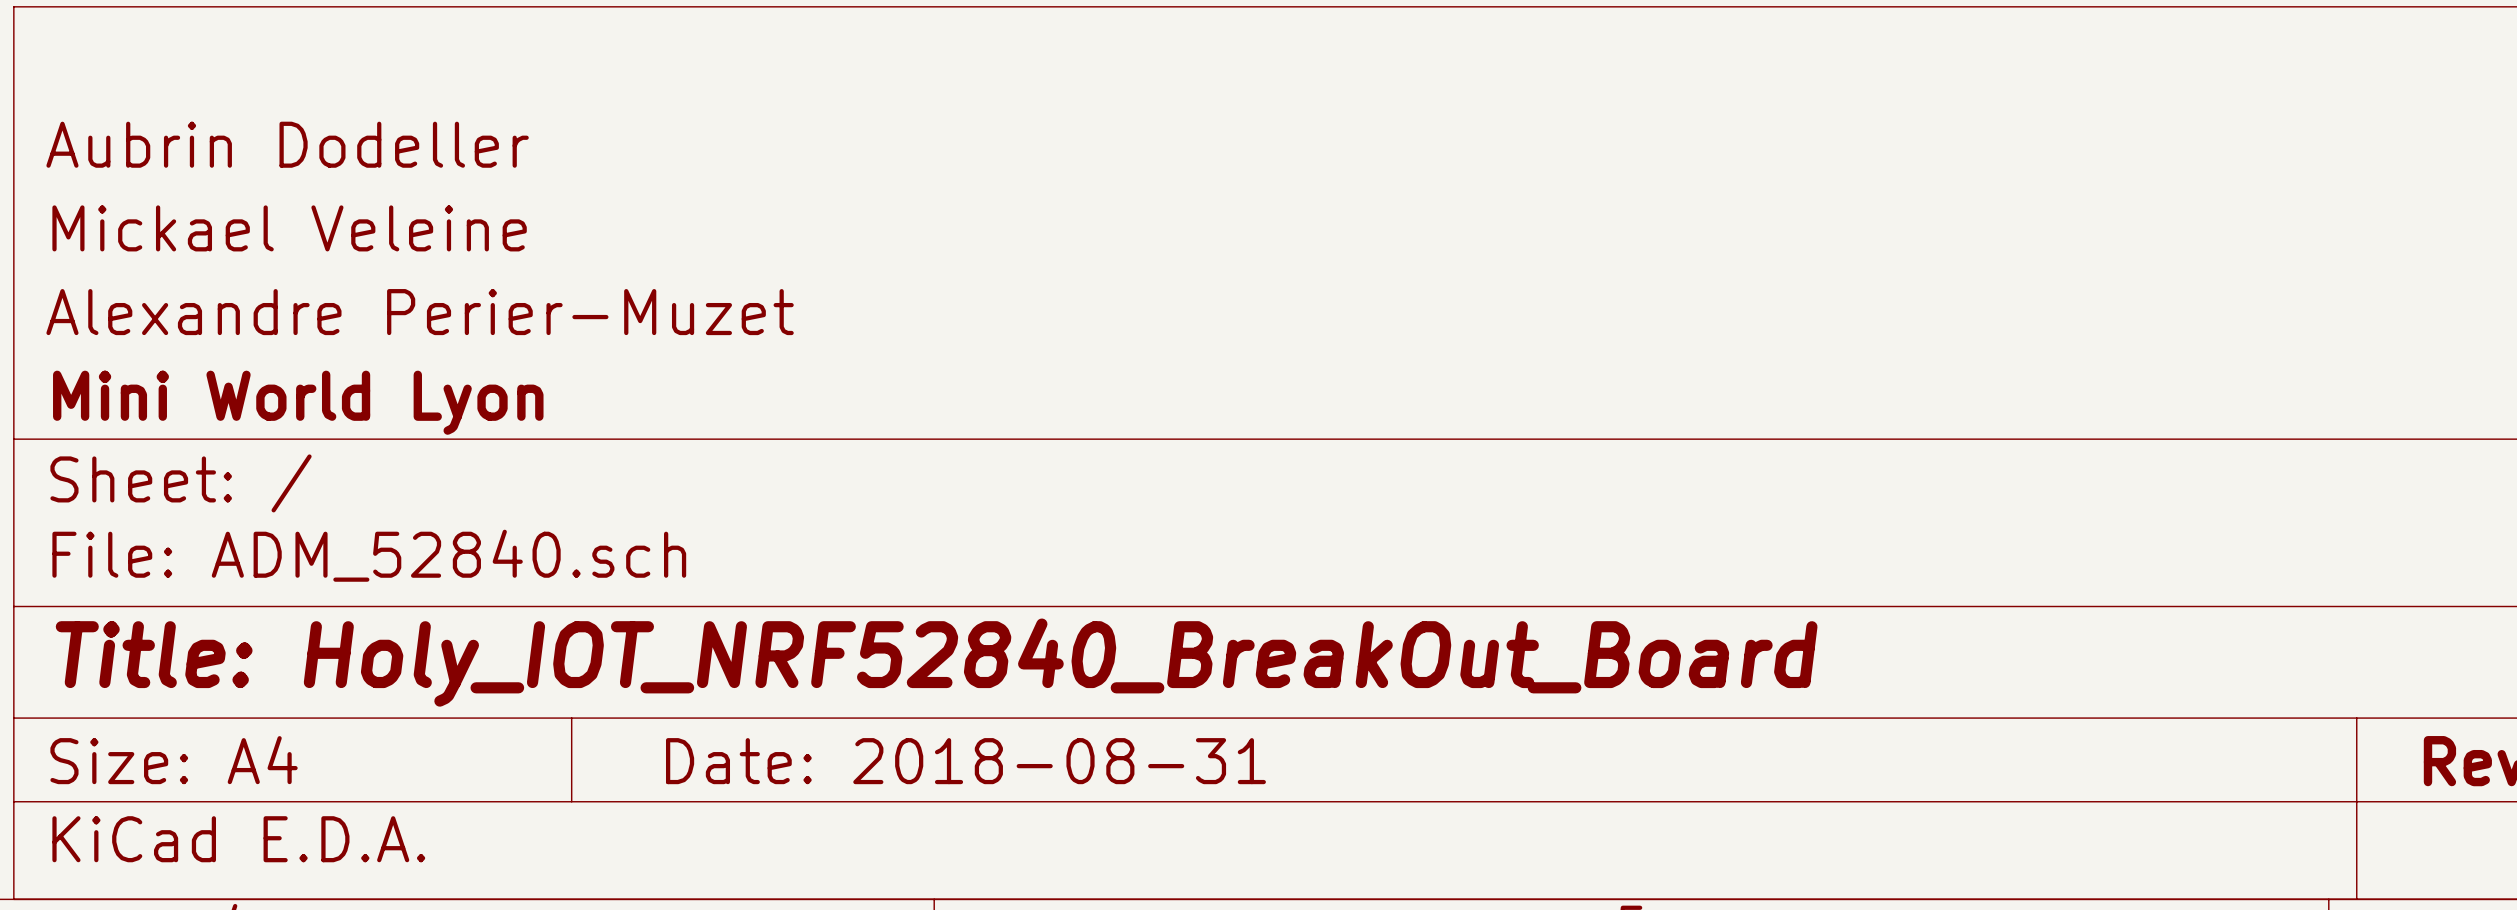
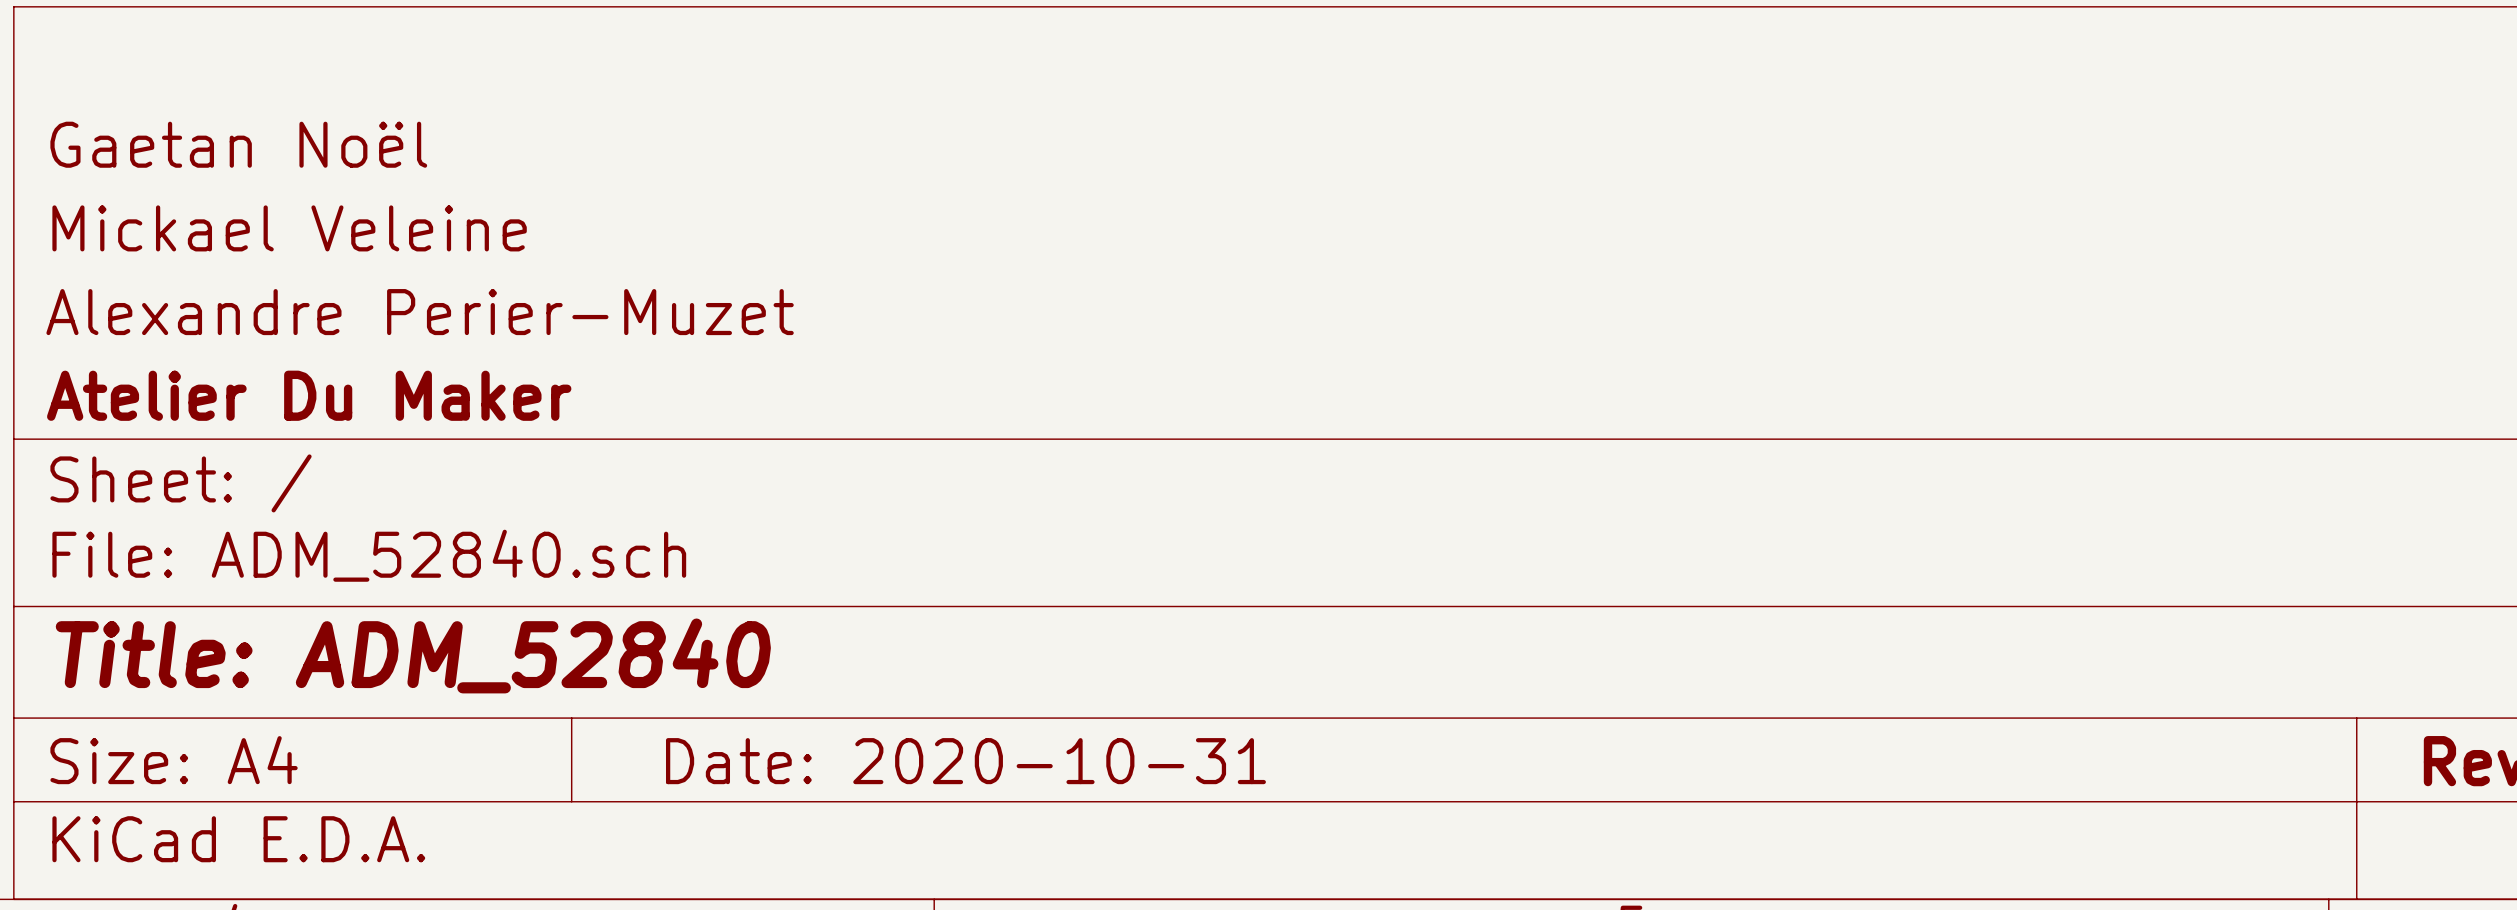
title block: Aubrin Dodeller (287, 144) -> Gaetan Noël (238, 144)
title block: Mini World Lyon (298, 402) -> Atelier Du Maker (309, 395)
title block: Title: Holy_IOT_NRF52840_BreakOut_Board (936, 662) -> Title: ADM_52840 (413, 655)
title block: Date: 2018-08-31 (965, 761) -> Date: 2020-10-31 (965, 761)

